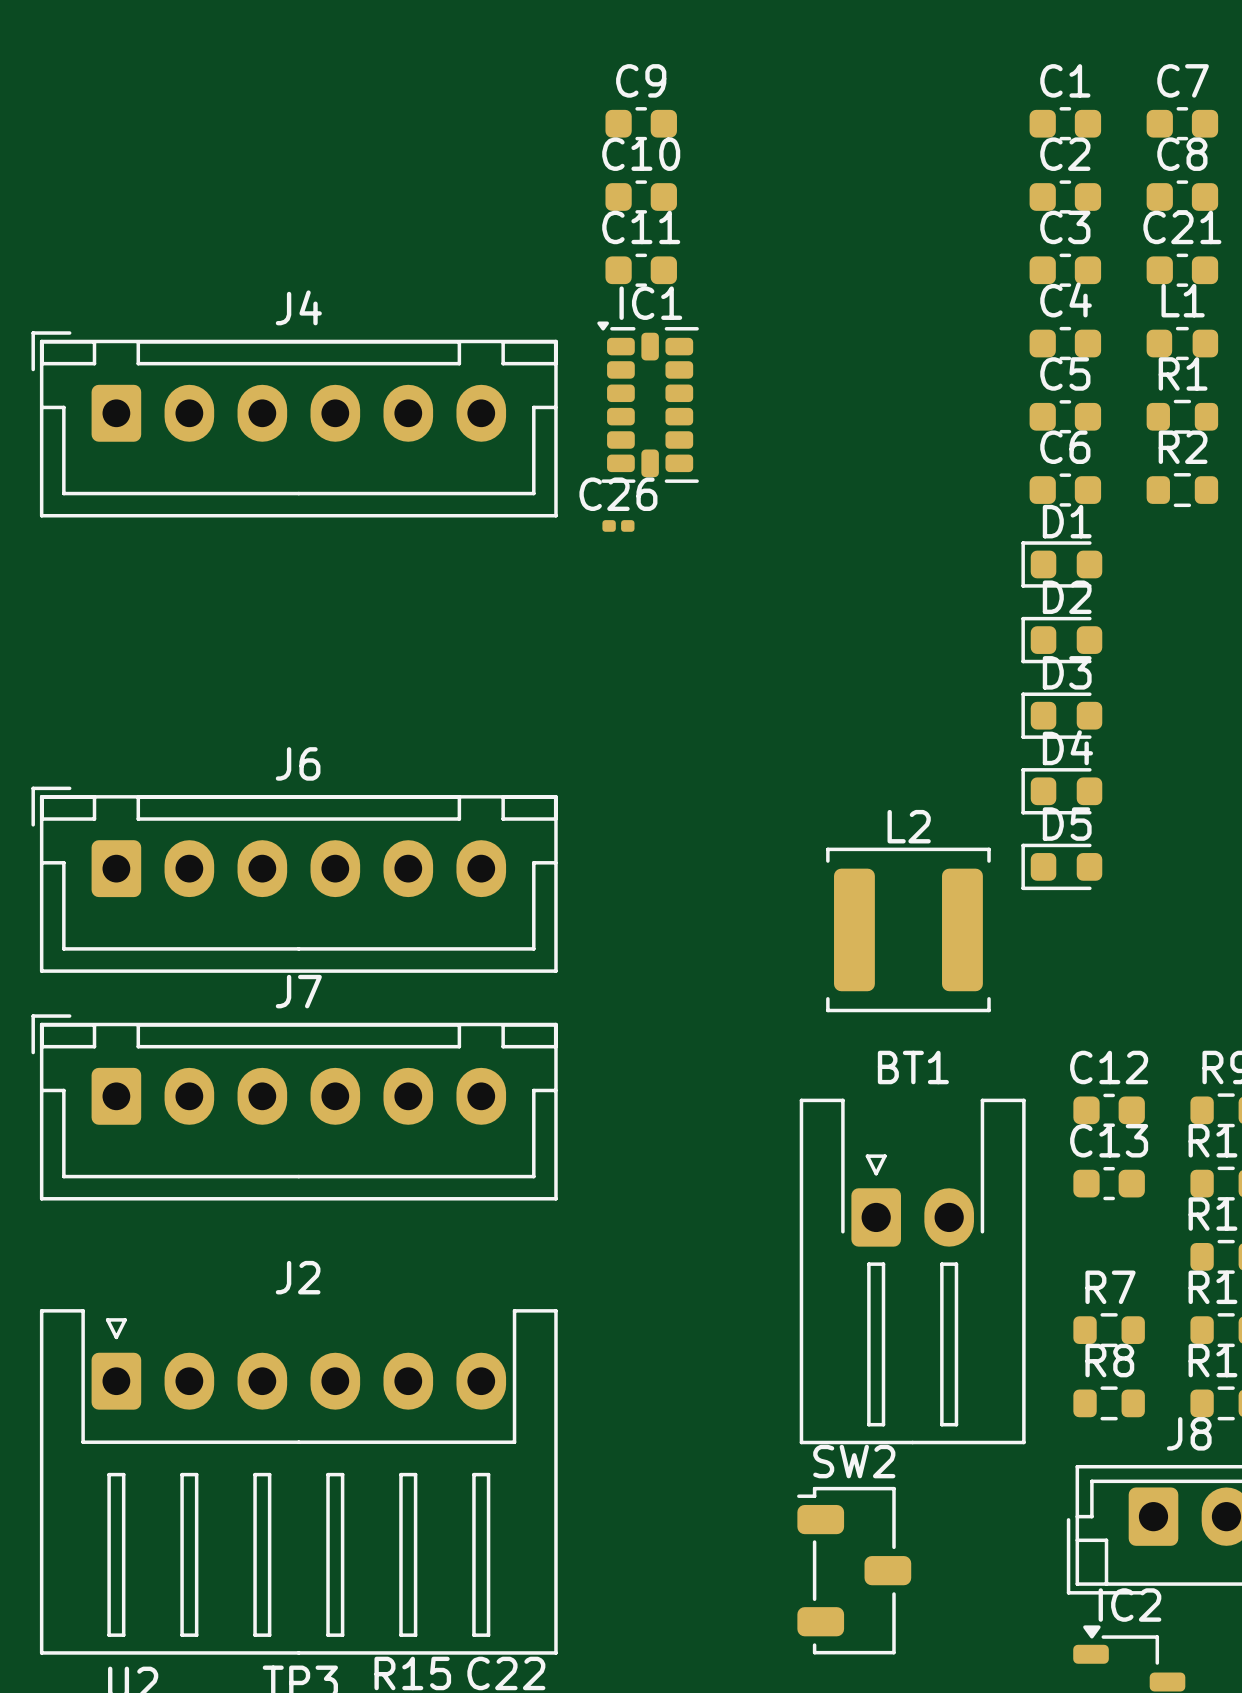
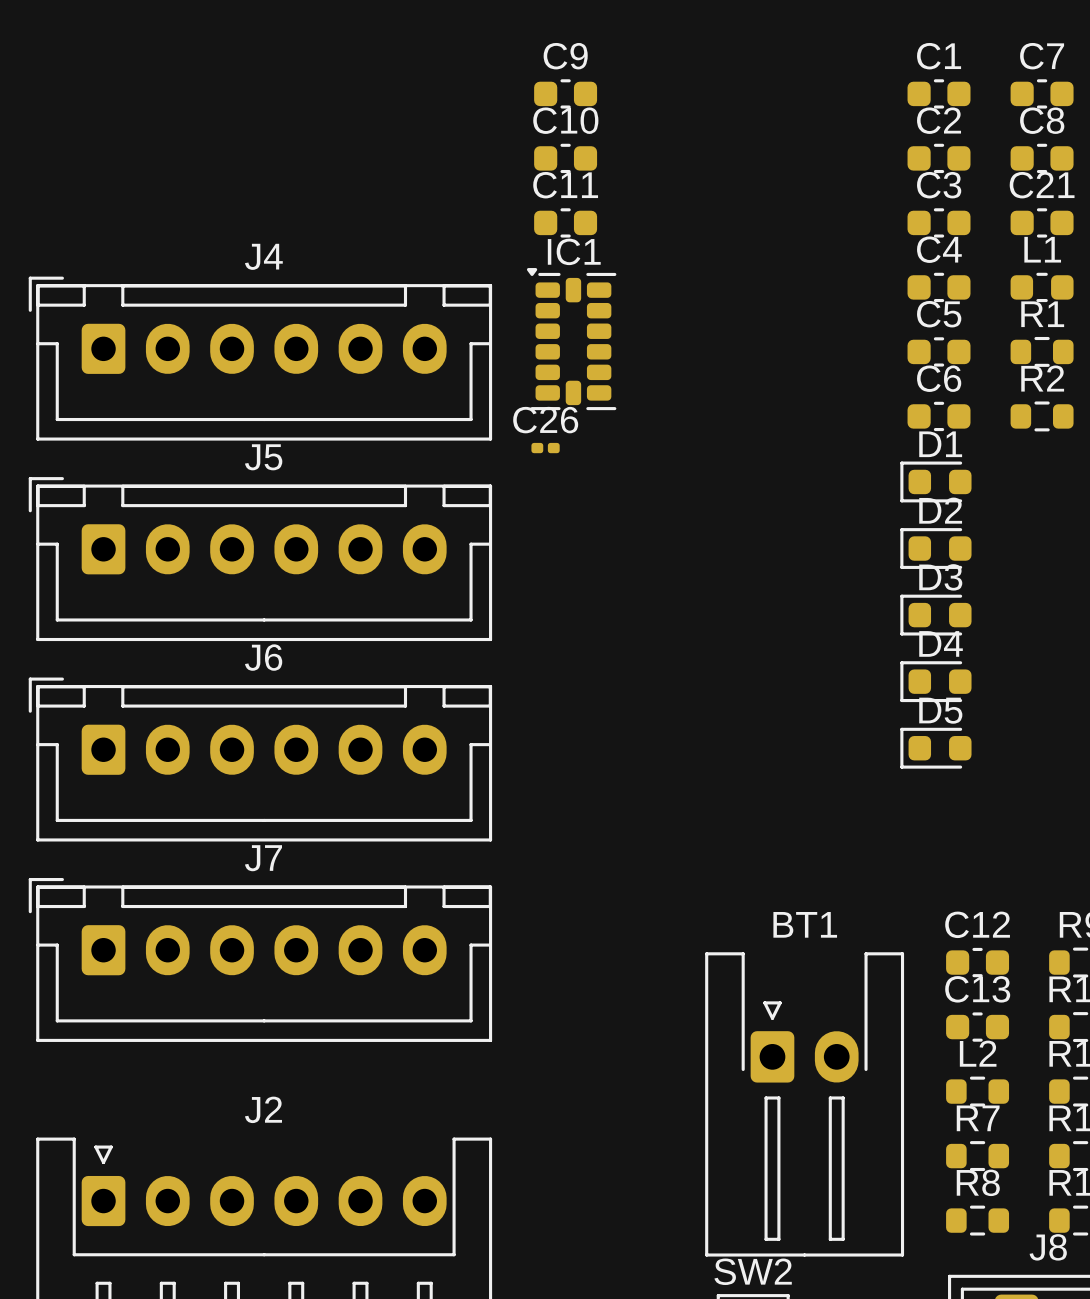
J5: none -> (260, 559)
L2 name position: L2 (909, 826) -> L2 (978, 1053)
L2 footprint: [826, 847, 991, 1013] -> [946, 1076, 1010, 1107]

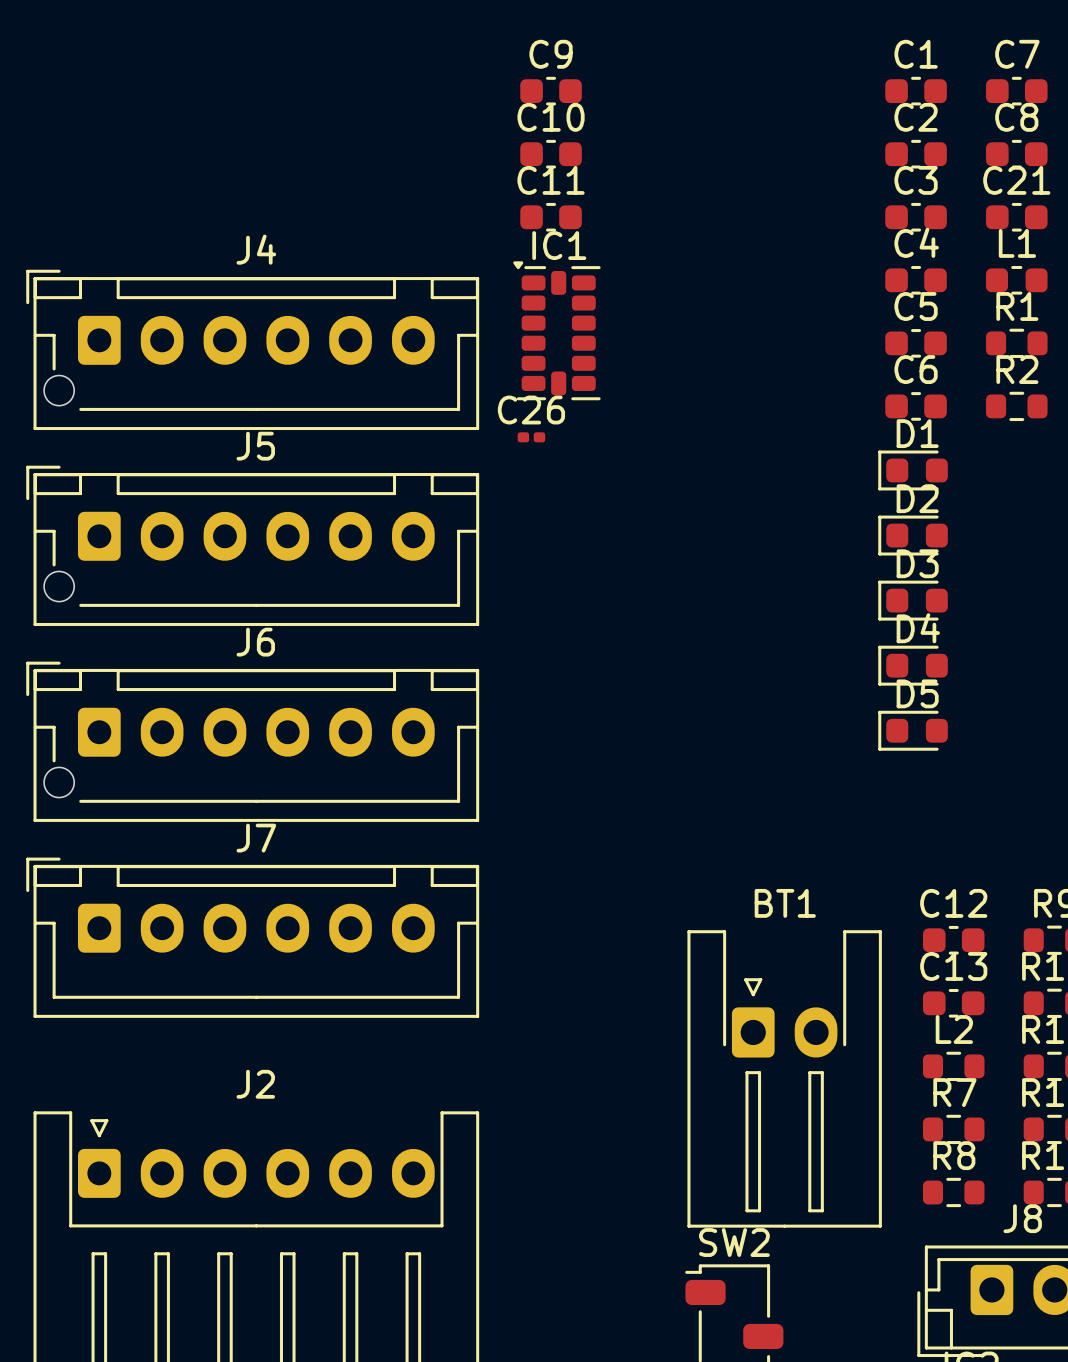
J4 footprint: [28, 276, 493, 441] -> [26, 269, 480, 431]
J5 footprint: [28, 477, 493, 642] -> [26, 465, 480, 626]
J6 footprint: [28, 677, 493, 842] -> [26, 661, 480, 822]

